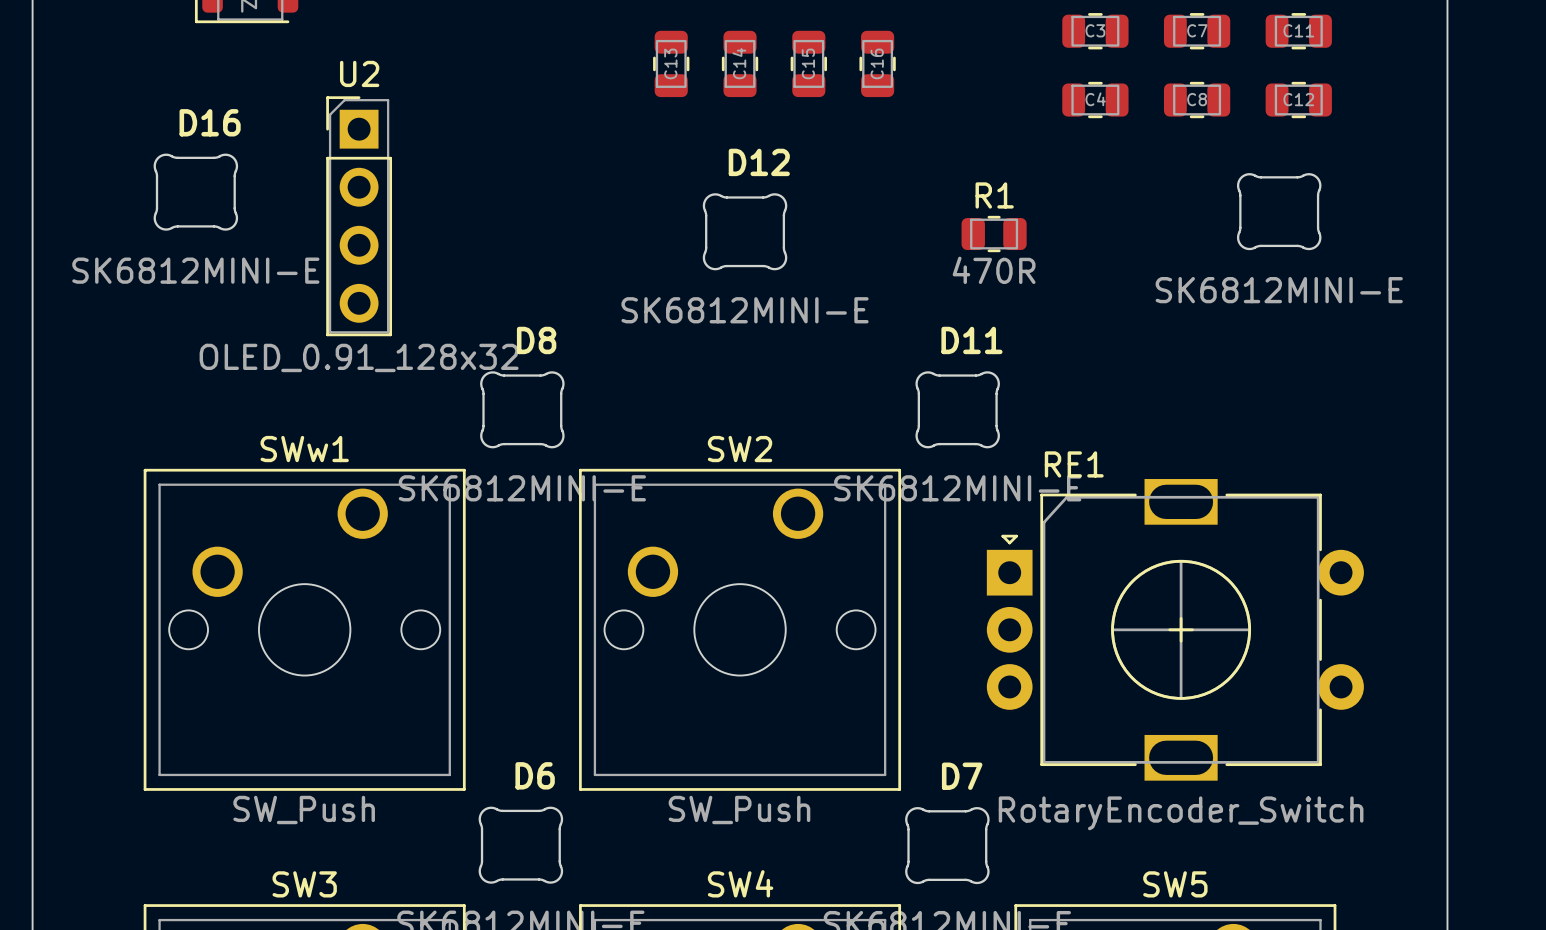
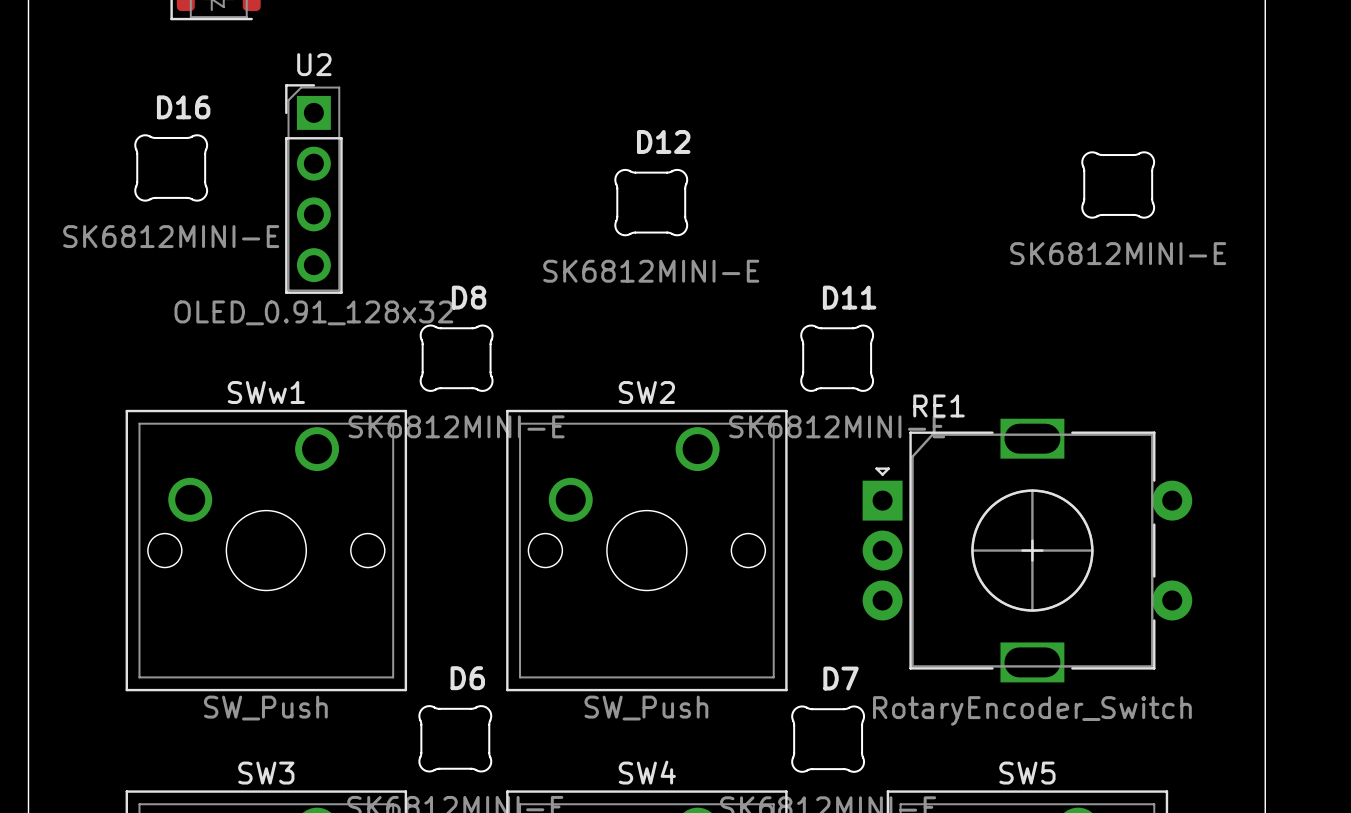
C3: (1095, 31) -> none
C7: (1197, 31) -> none
C11: (1298, 31) -> none
C13: (671, 63) -> none
C14: (740, 63) -> none
C15: (808, 63) -> none
C16: (877, 63) -> none
C4: (1095, 100) -> none
C8: (1197, 100) -> none
C12: (1298, 100) -> none
R1: 470R (994, 234) -> none

